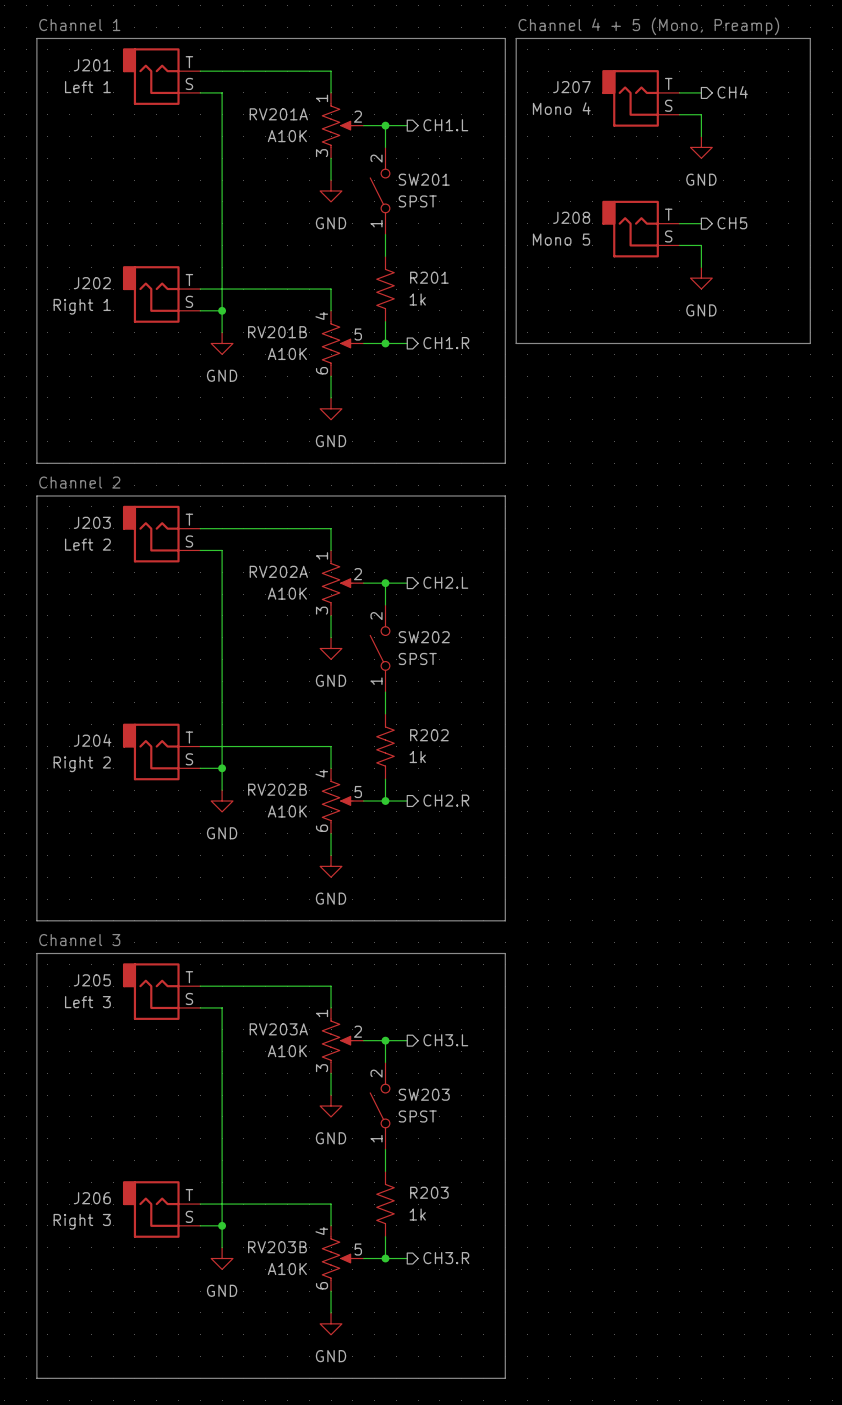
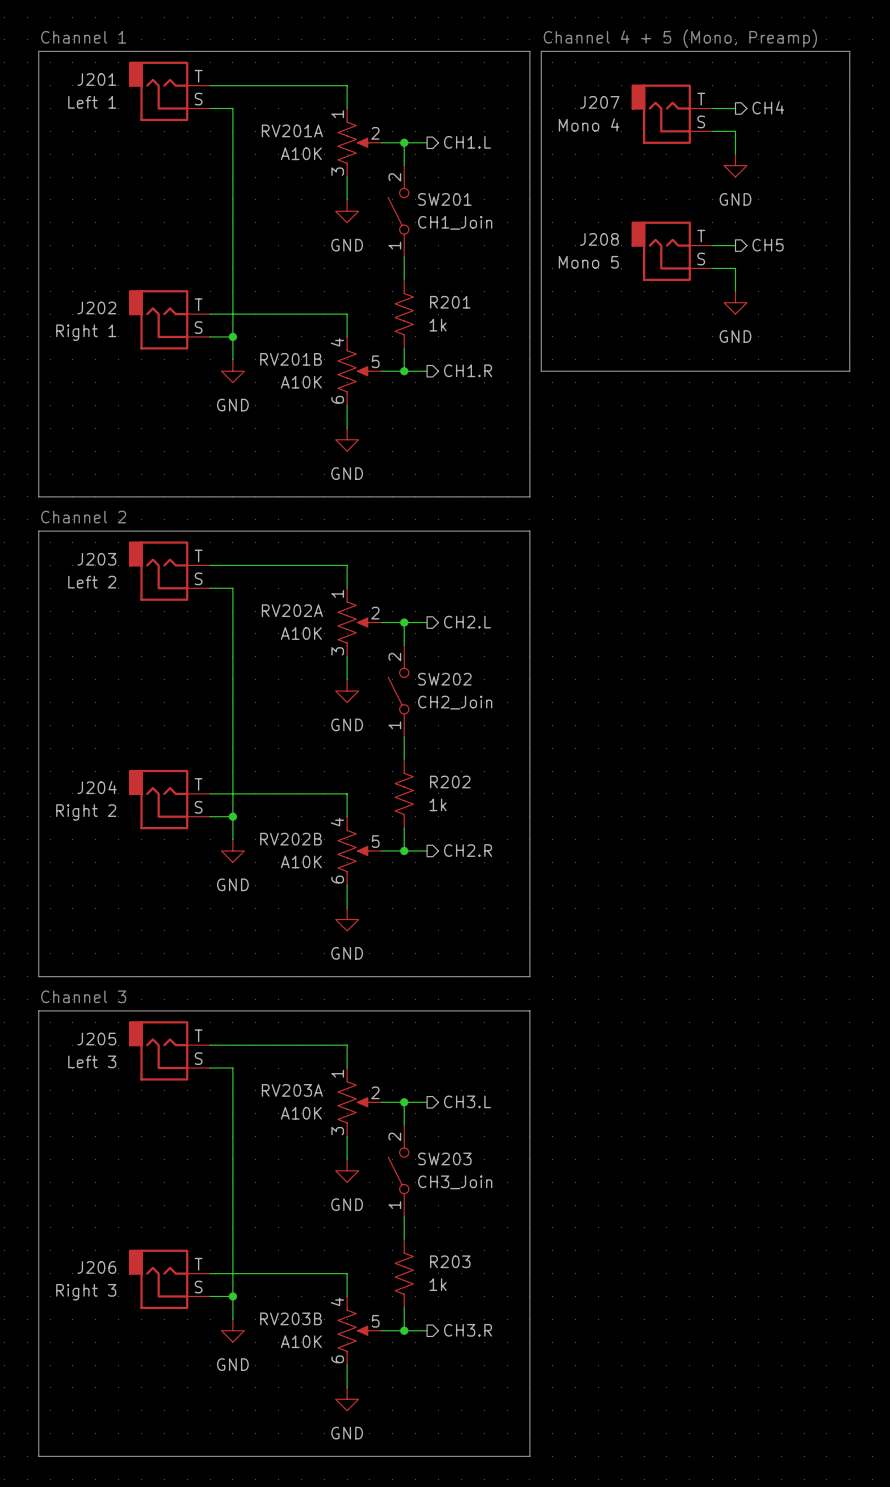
SW201 value: SPST (417, 201) -> CH1_Join (455, 222)
SW202 value: SPST (417, 658) -> CH2_Join (455, 702)
SW203 value: SPST (417, 1116) -> CH3_Join (455, 1182)

